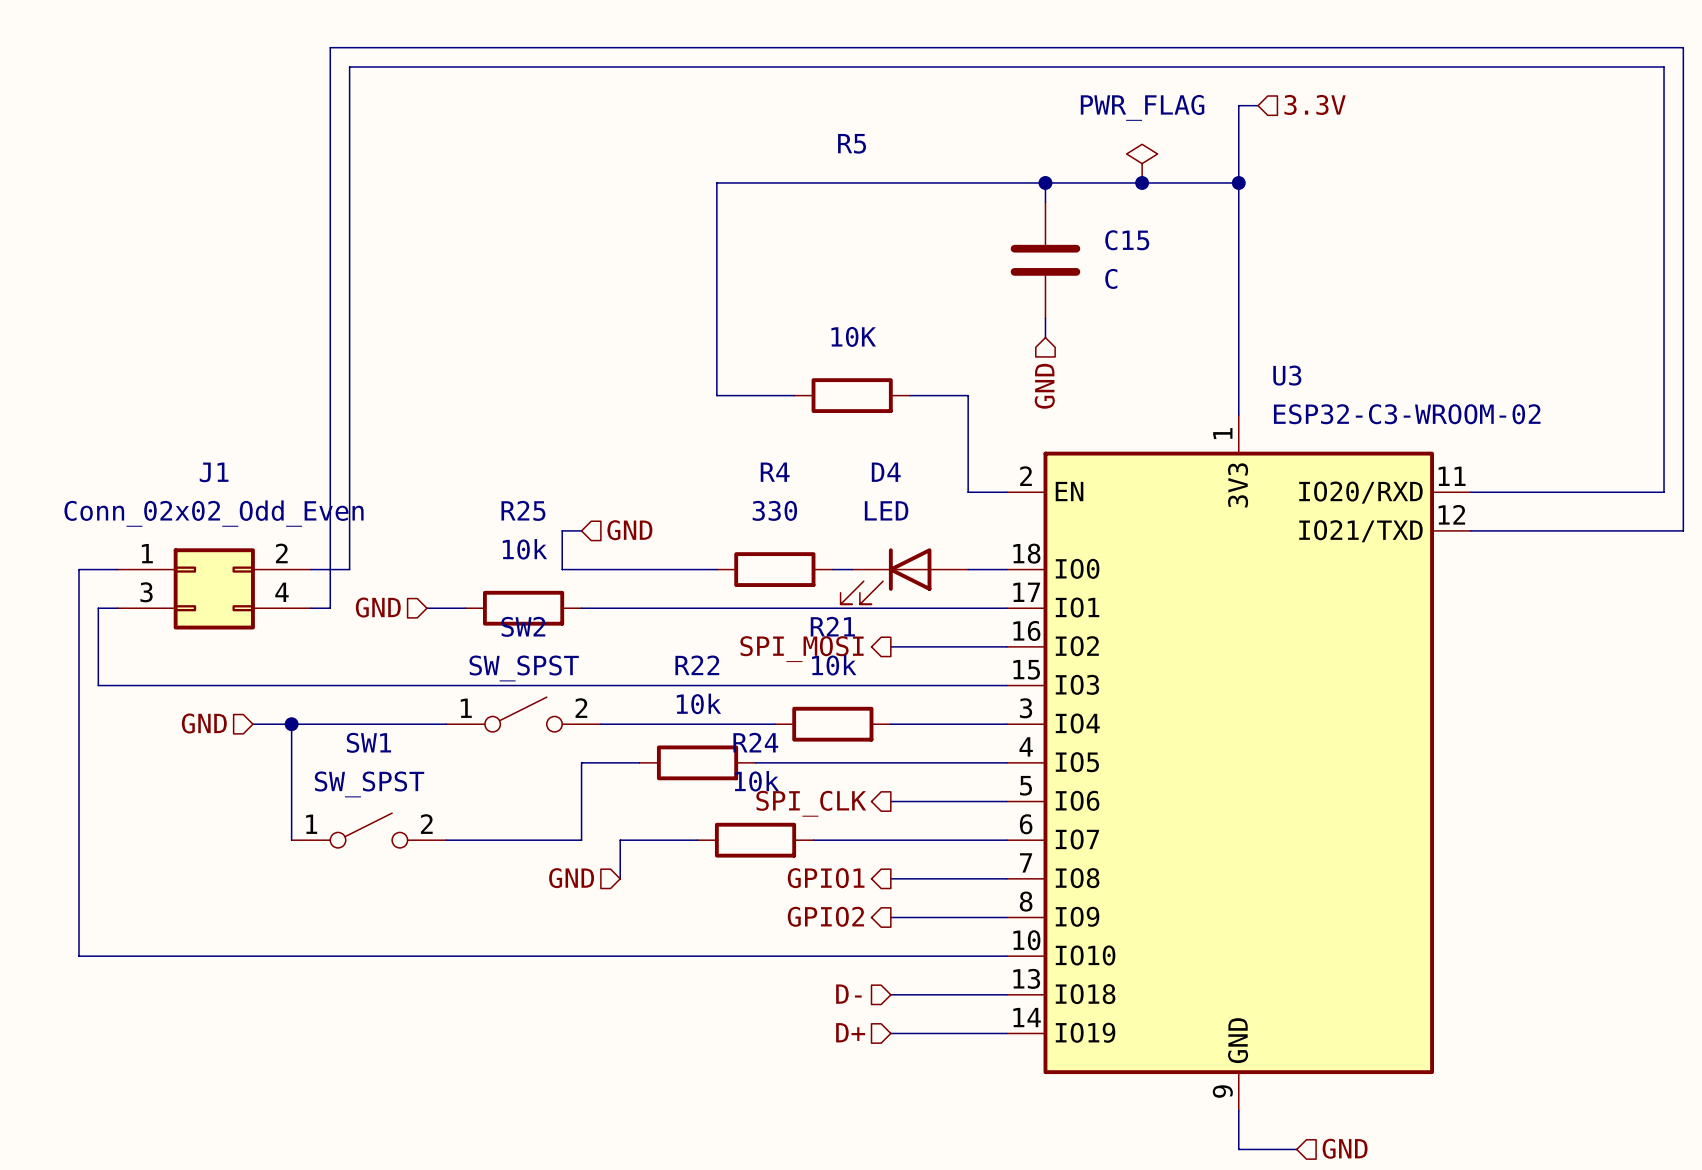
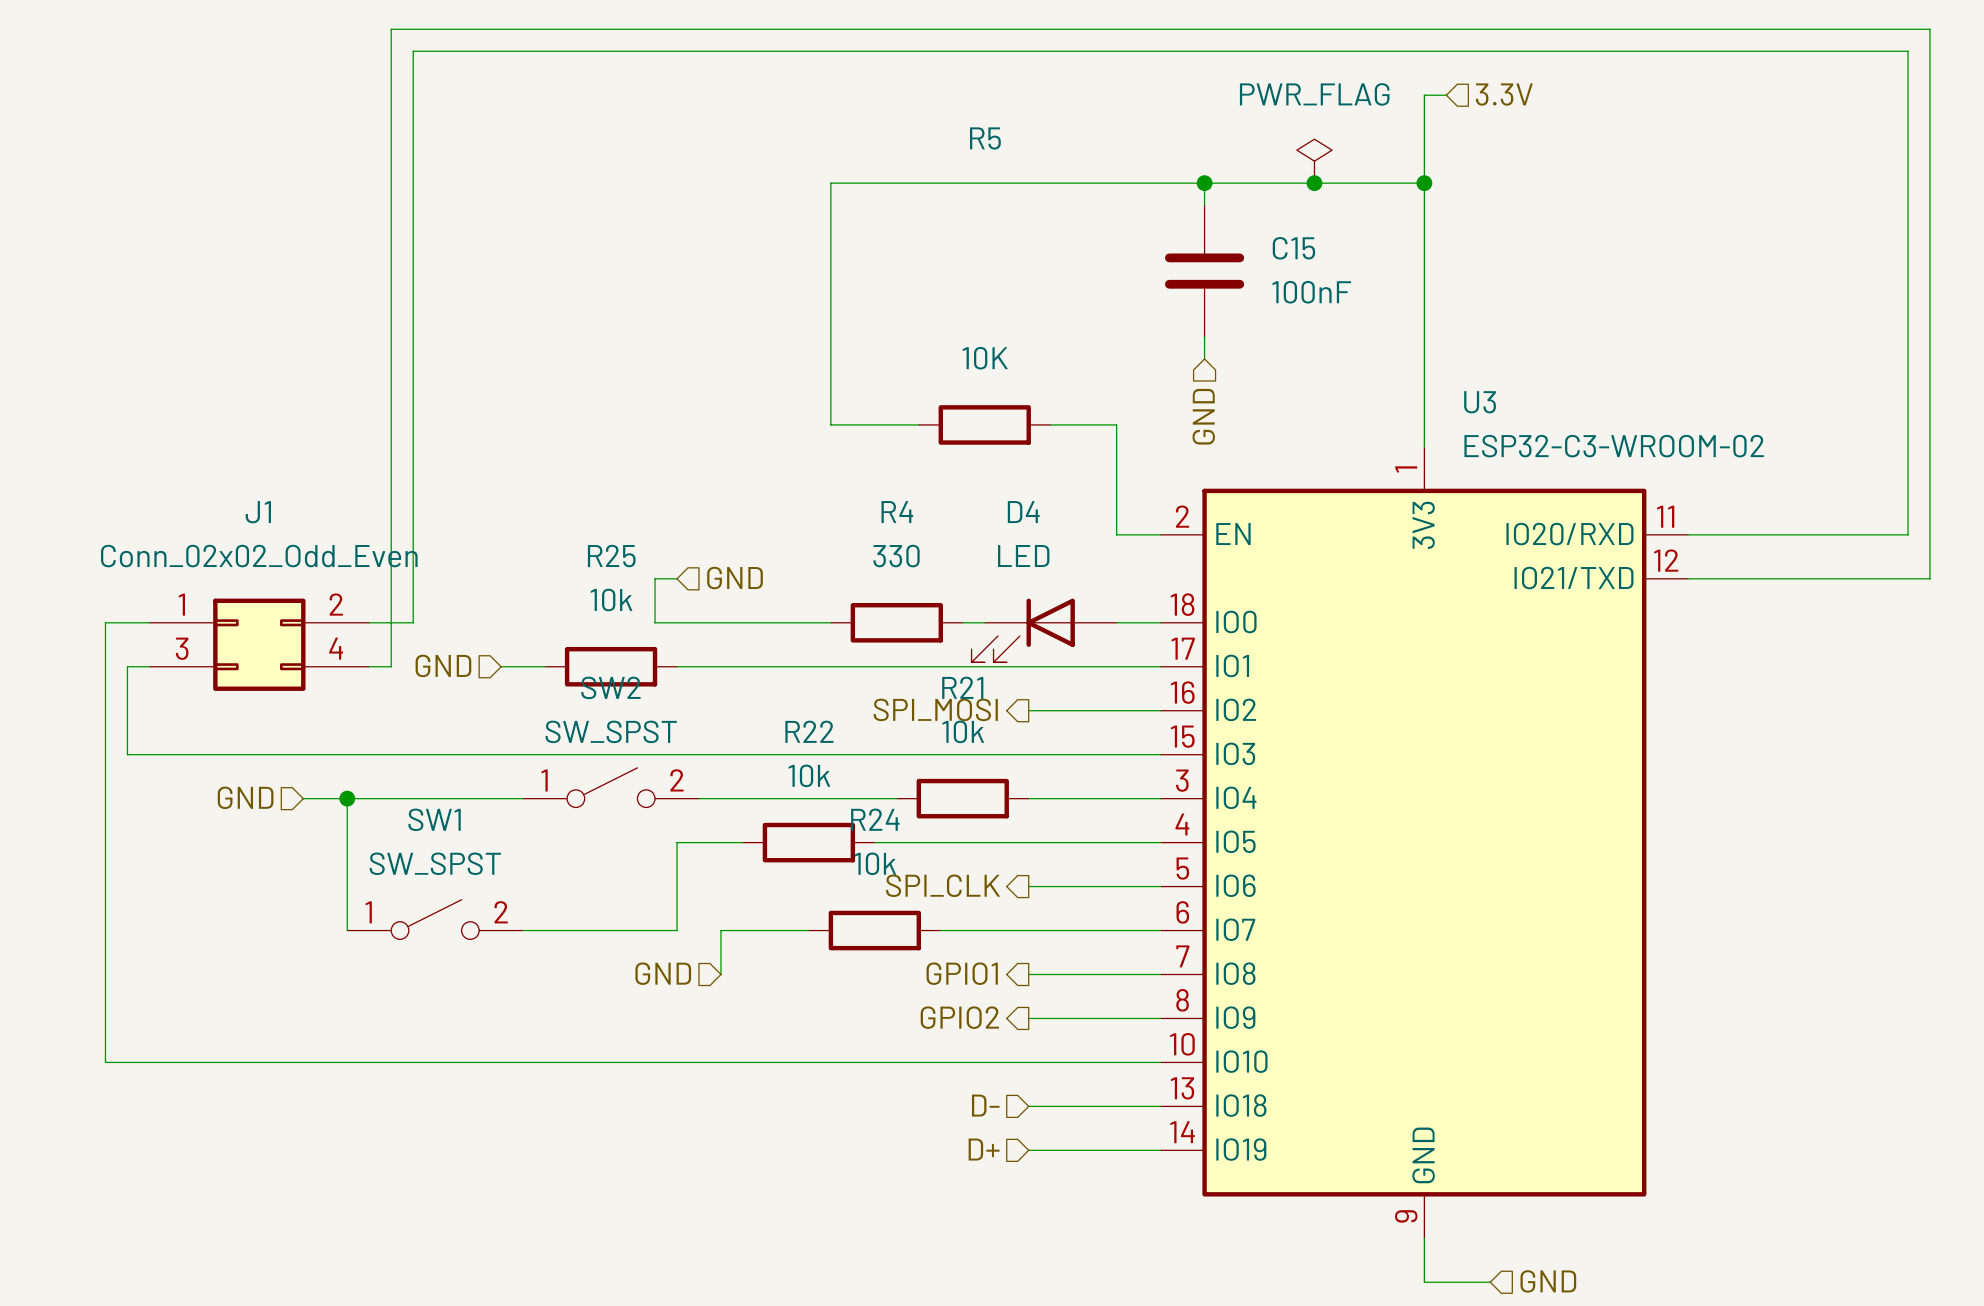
C15 value: C (1111, 278) -> 100nF (1311, 292)

